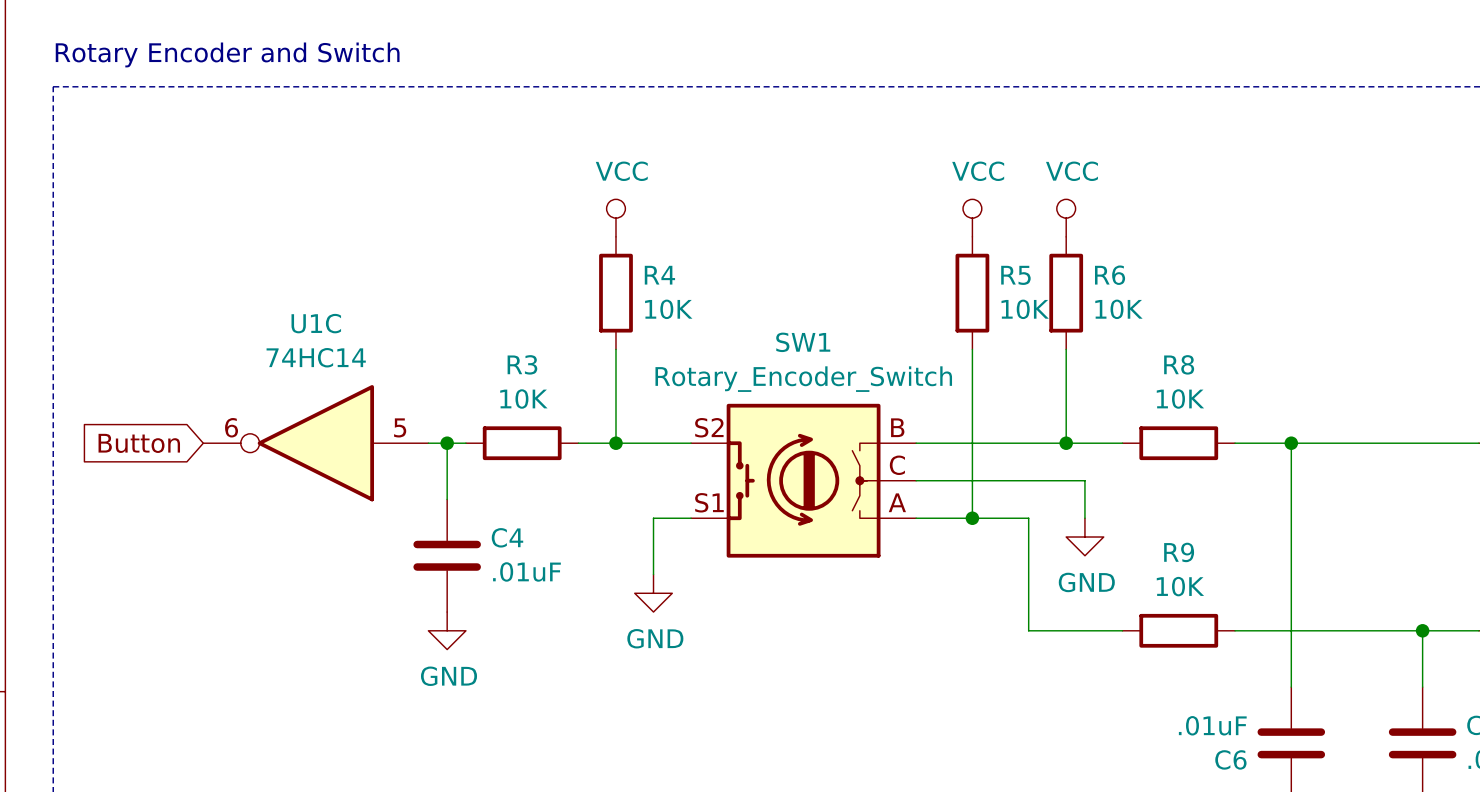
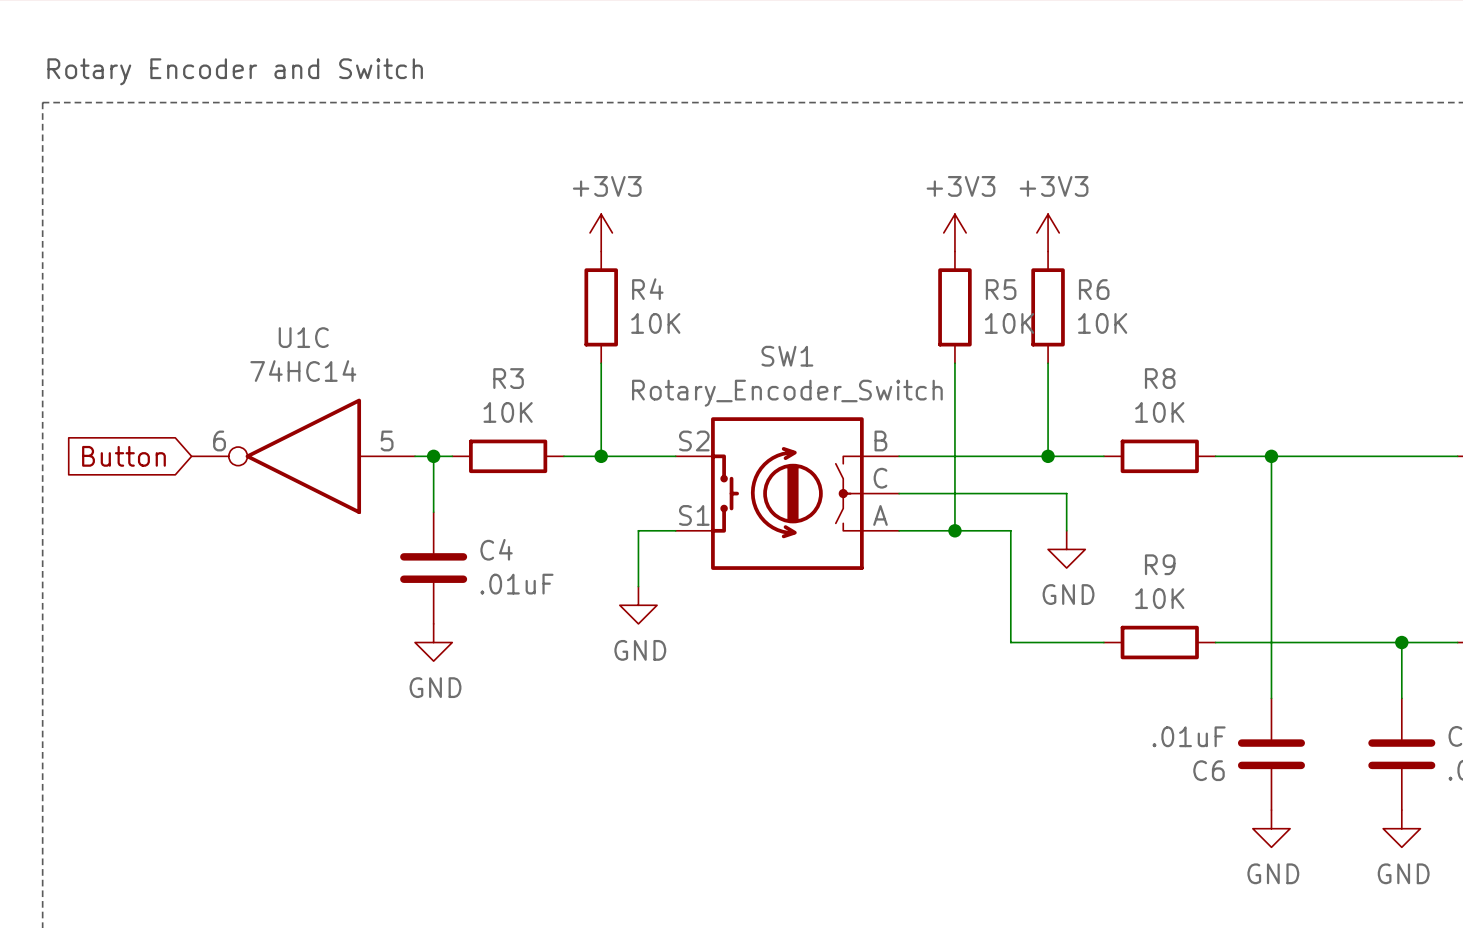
power symbol: VCC (615, 218) -> +3V3 (601, 232)
power symbol: VCC (972, 218) -> +3V3 (954, 232)
power symbol: VCC (1066, 218) -> +3V3 (1048, 232)

